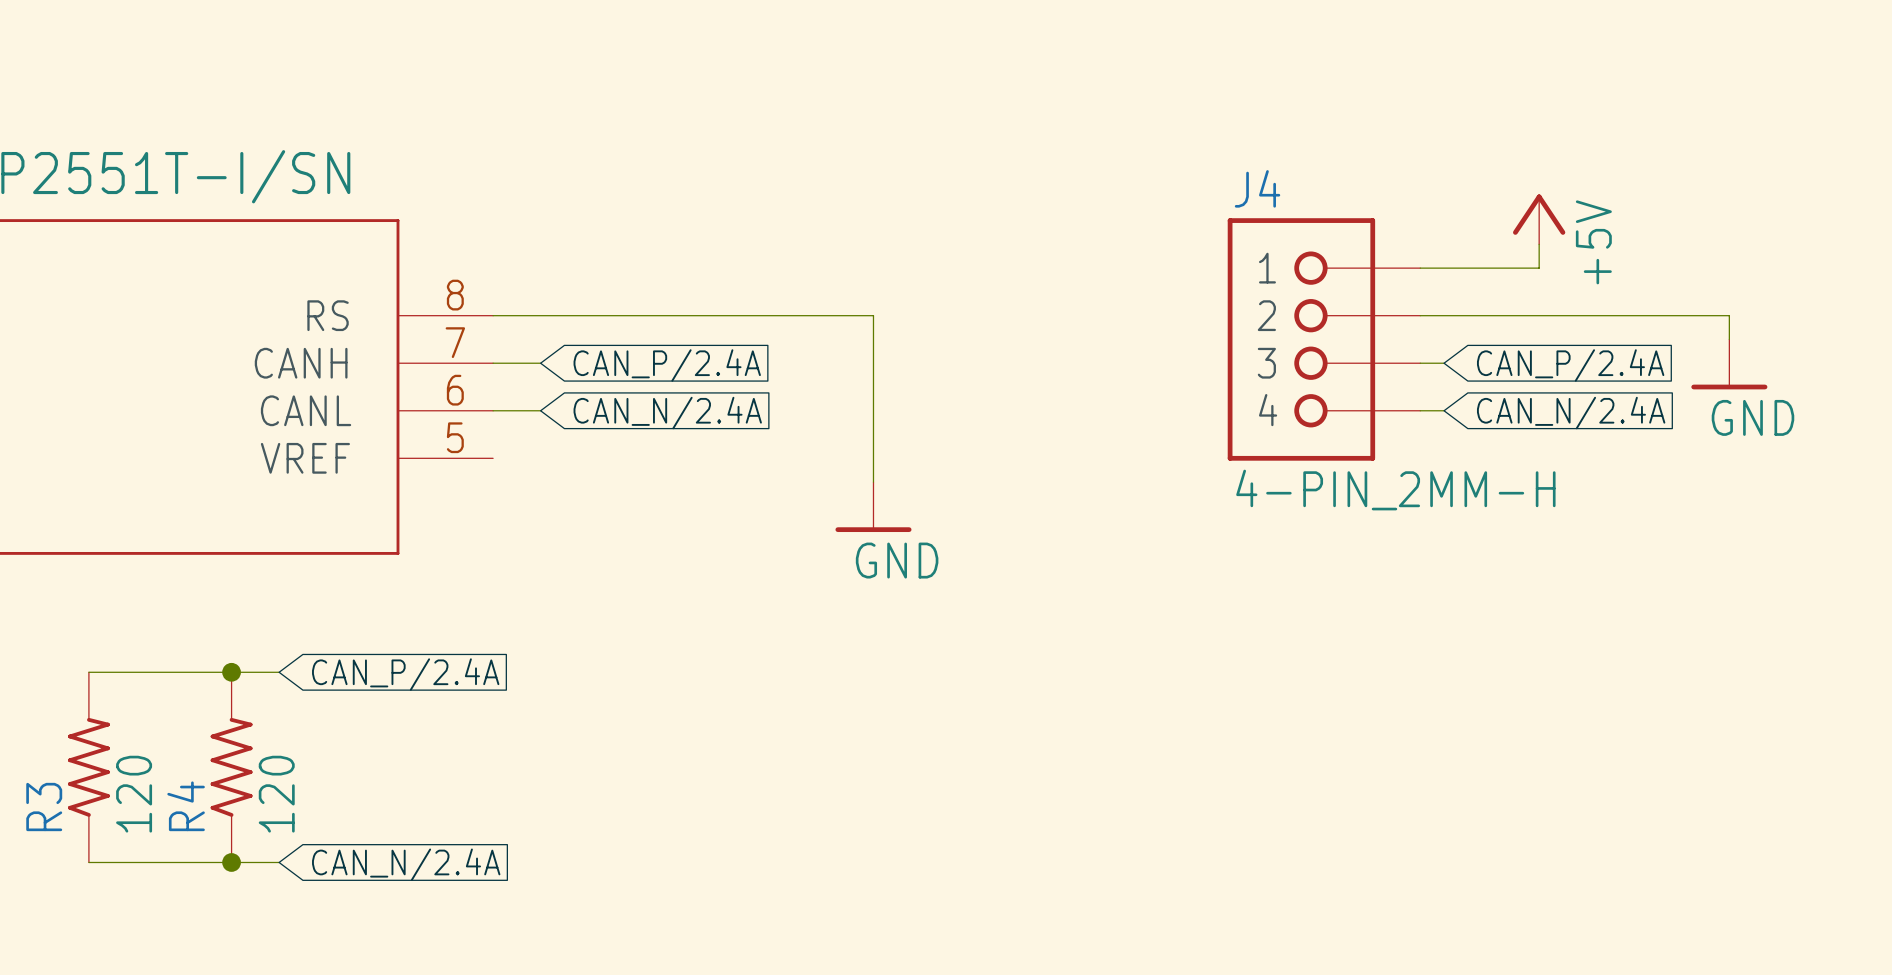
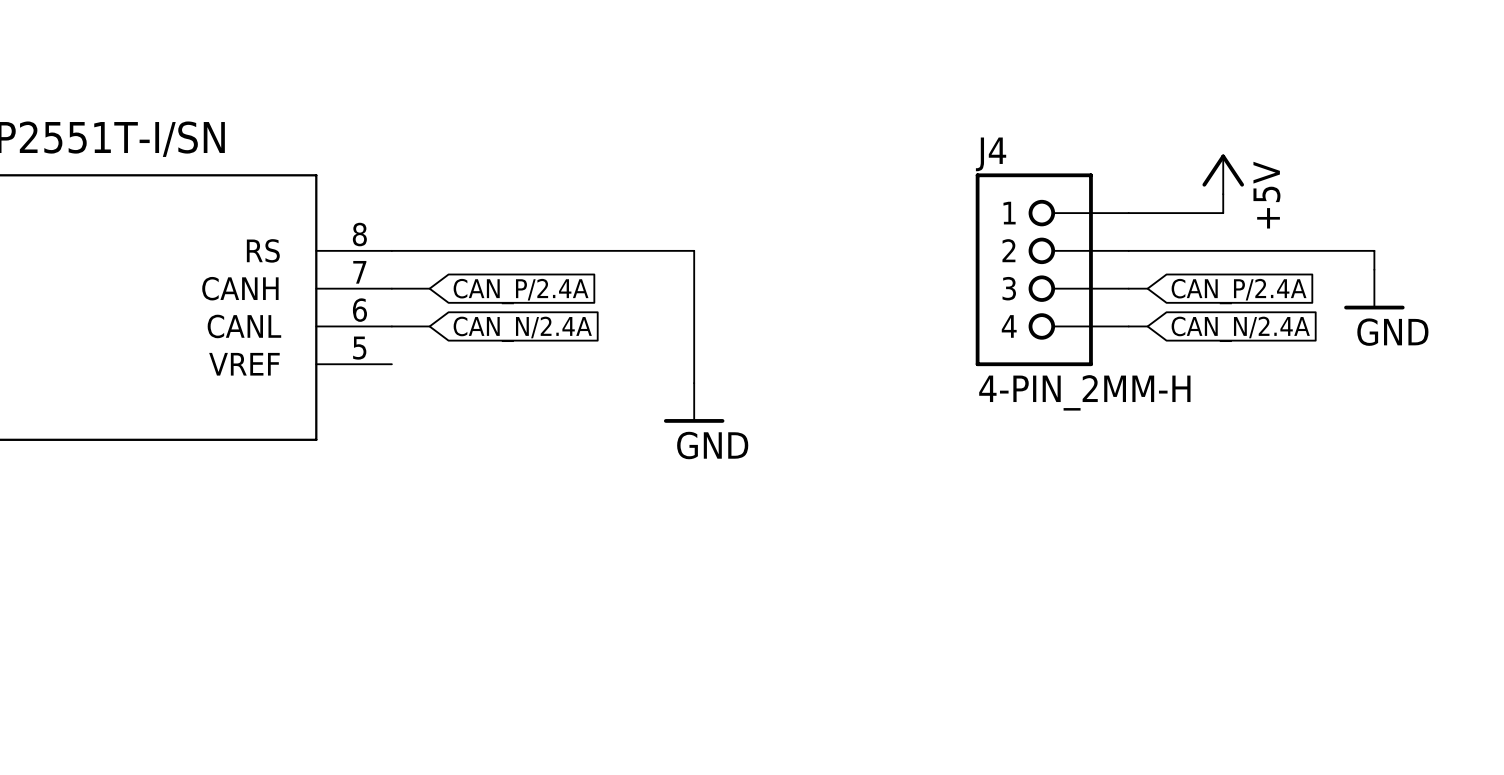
wire: (88, 672) (279, 672) -> none
junction: (231, 672) -> none
global label: CAN_P/2.4A (405, 674) -> none
R3: 120 (88, 767) -> none
R4: 120 (231, 767) -> none
wire: (88, 862) (279, 862) -> none
junction: (231, 862) -> none
global label: CAN_N/2.4A (406, 864) -> none

